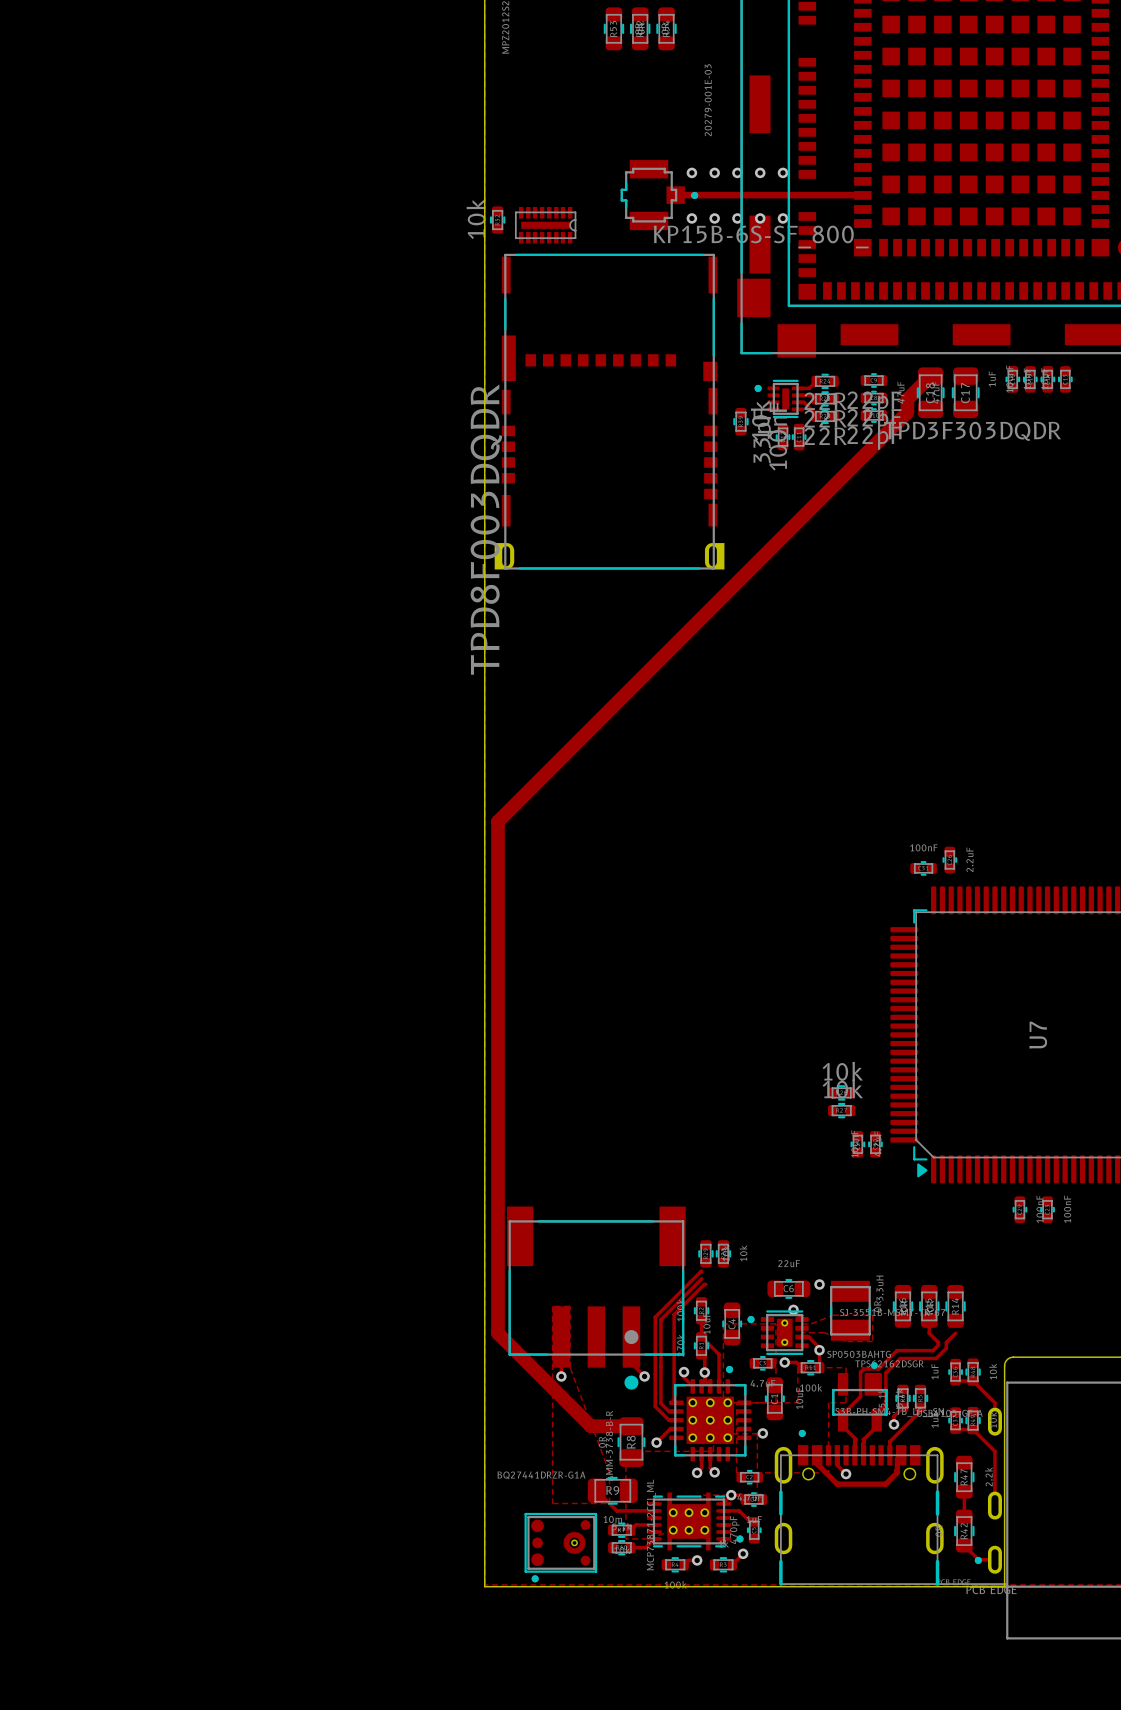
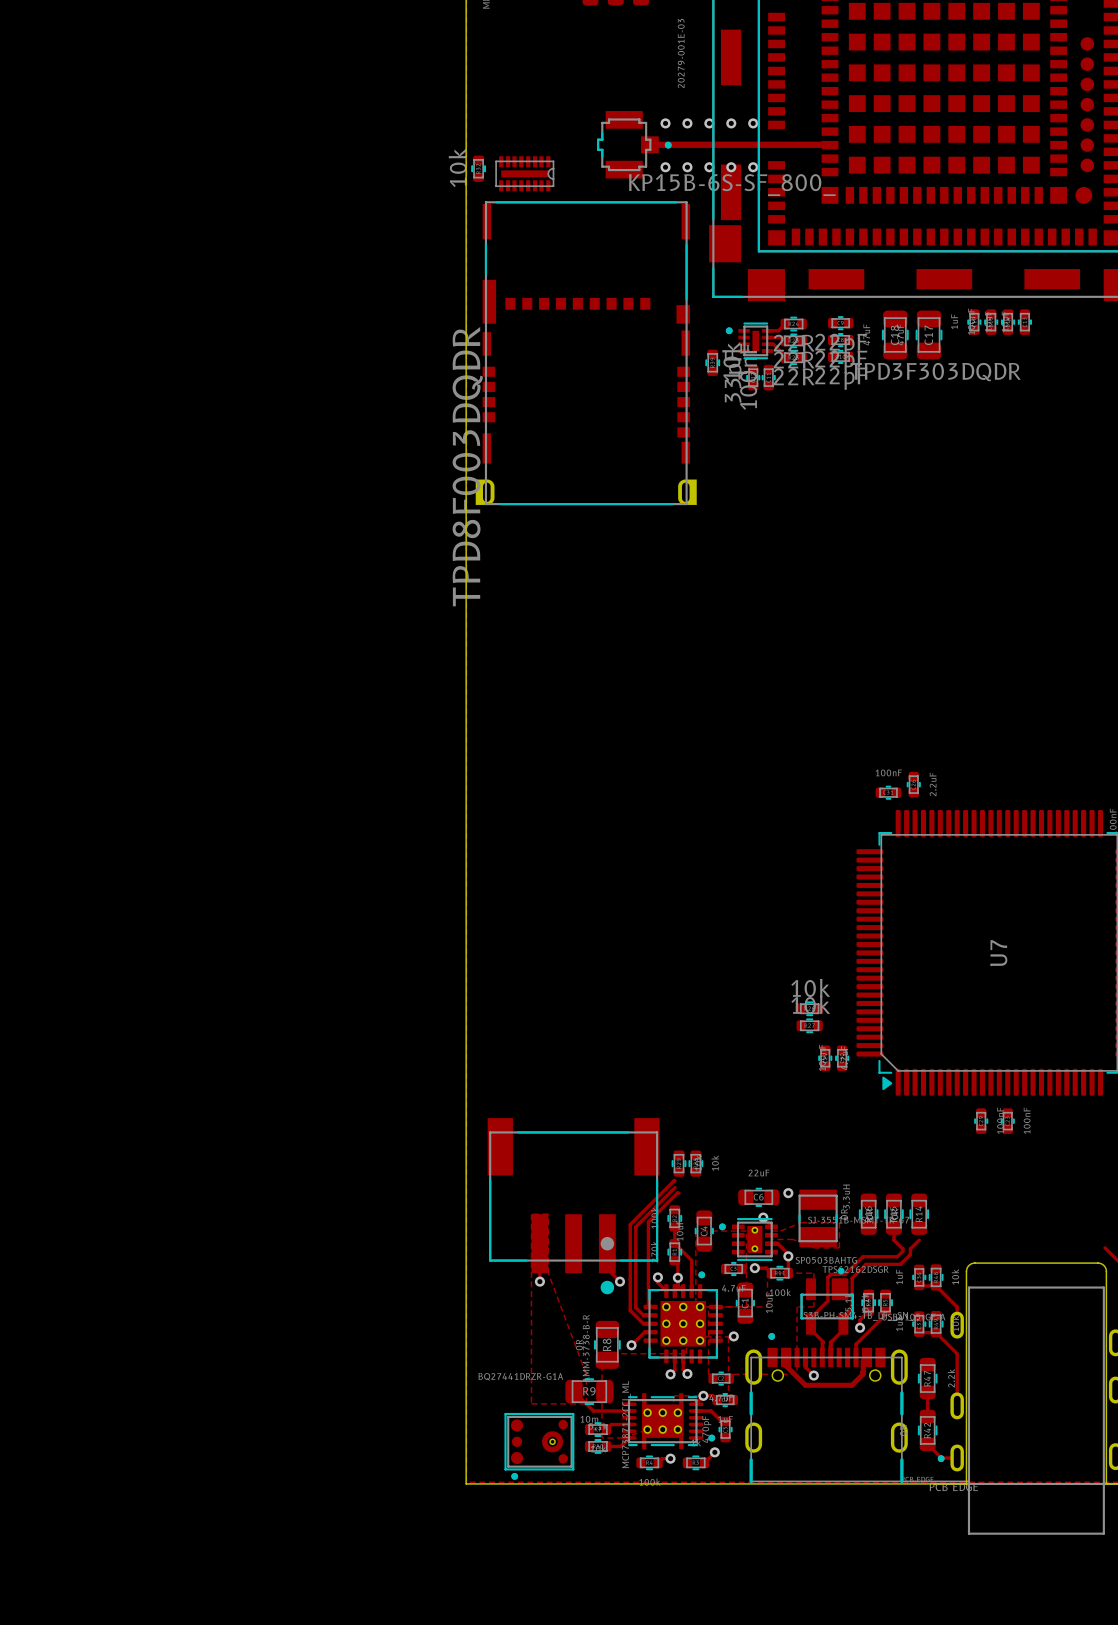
track: (930, 376) (907, 399) (907, 412) (498, 821) (498, 1333) (590, 1426) (631, 1426) -> none

